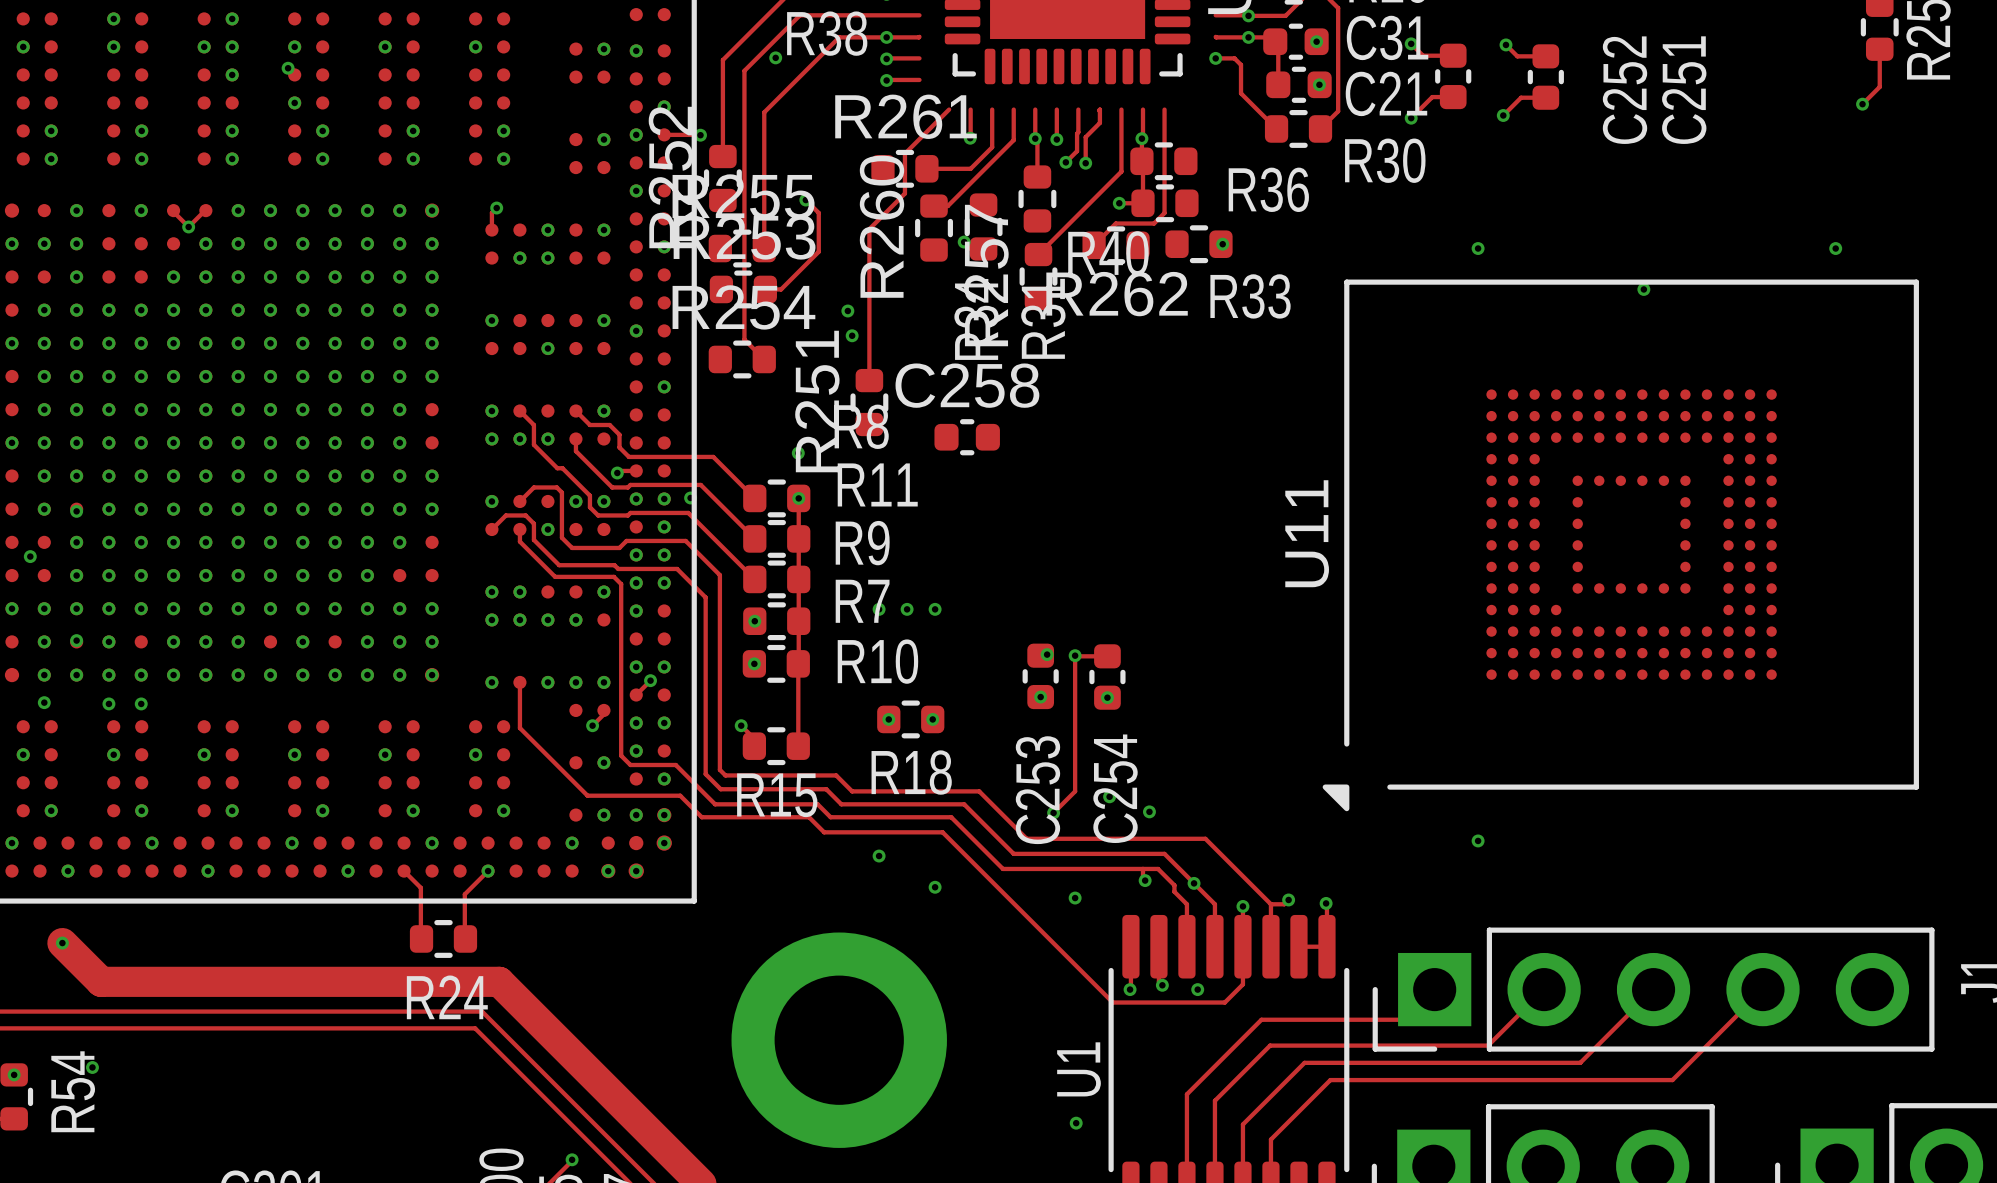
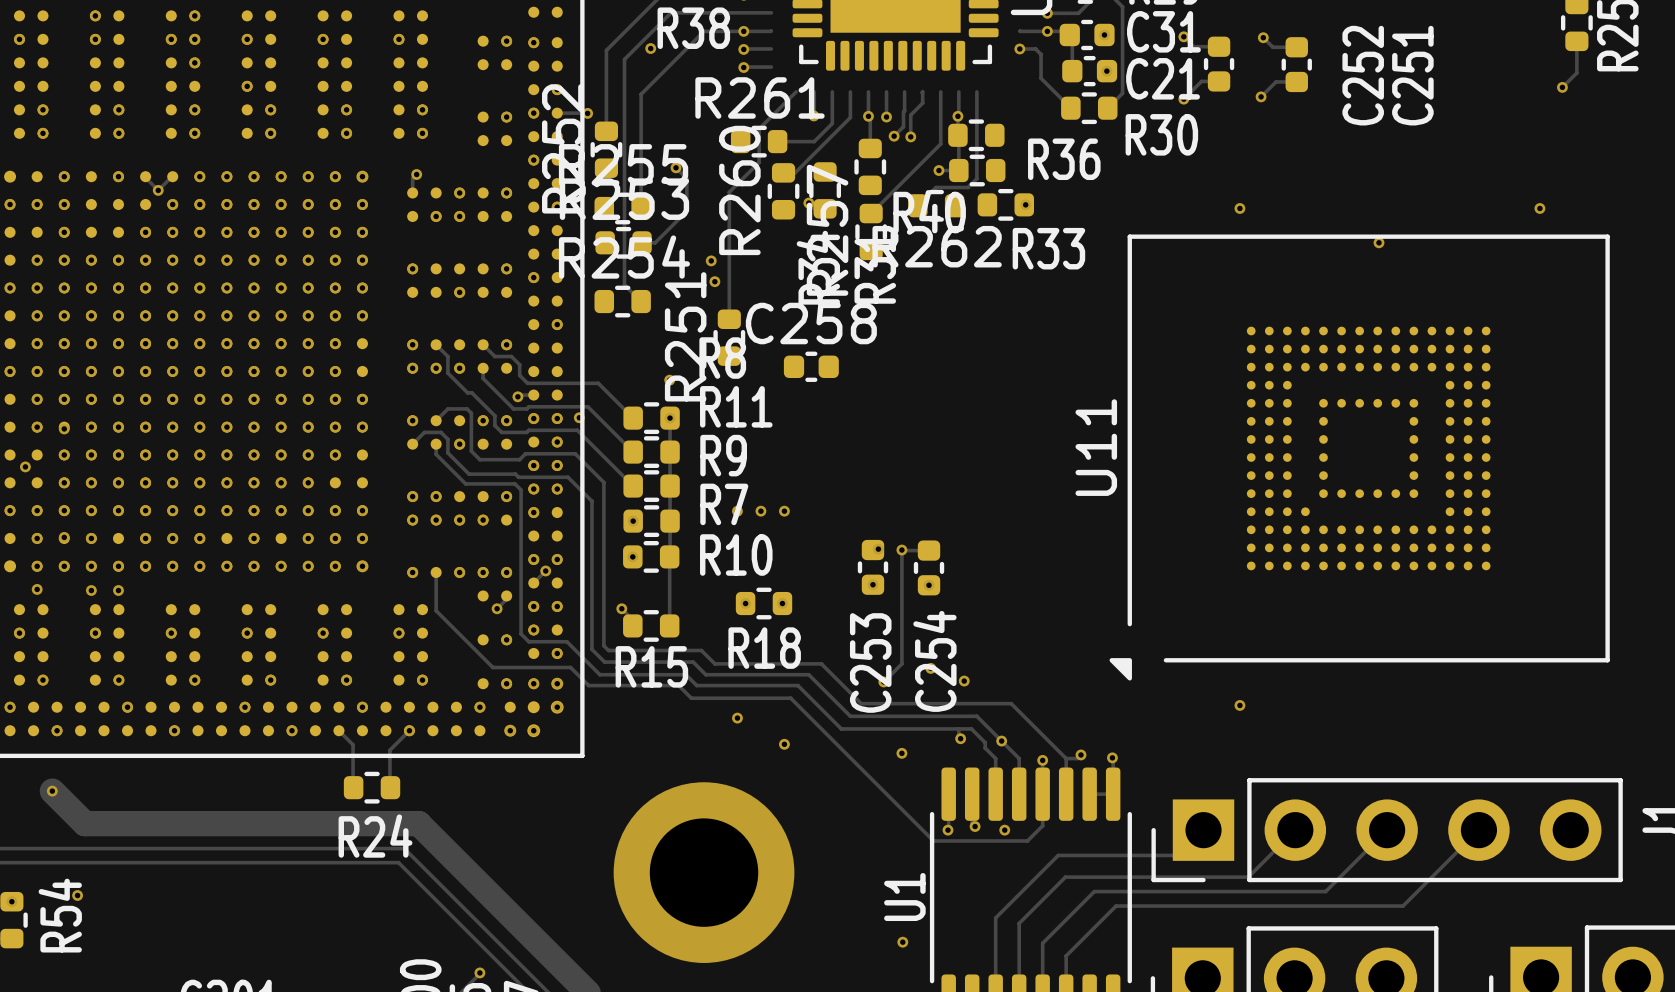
via: (288, 68) -> none

